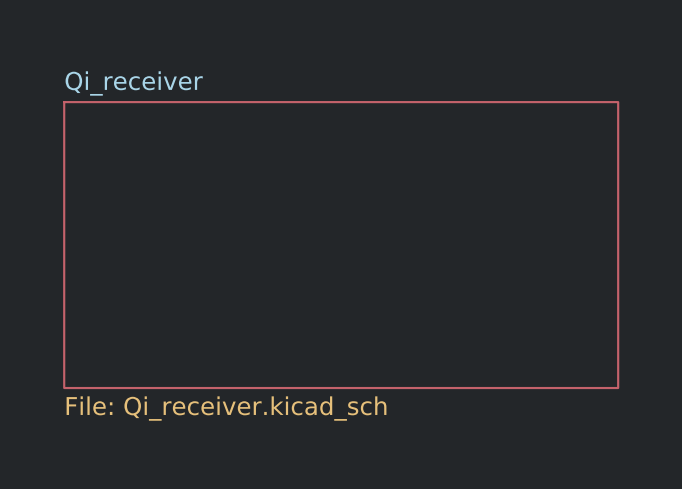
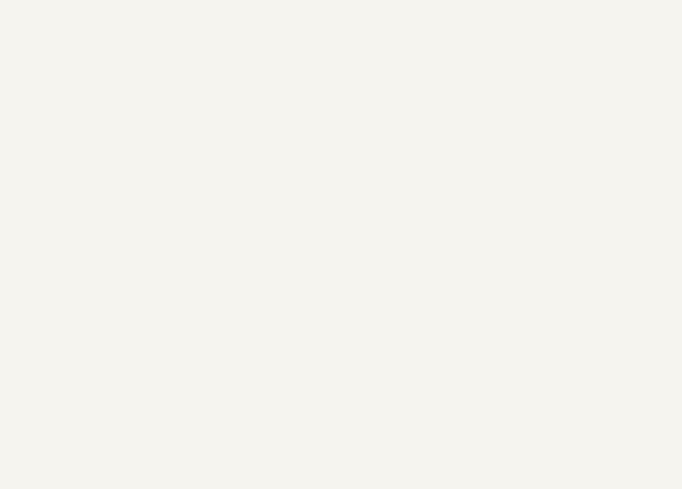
sheet Qi_receiver: File: Qi_receiver.kicad_sch (341, 245) -> none

